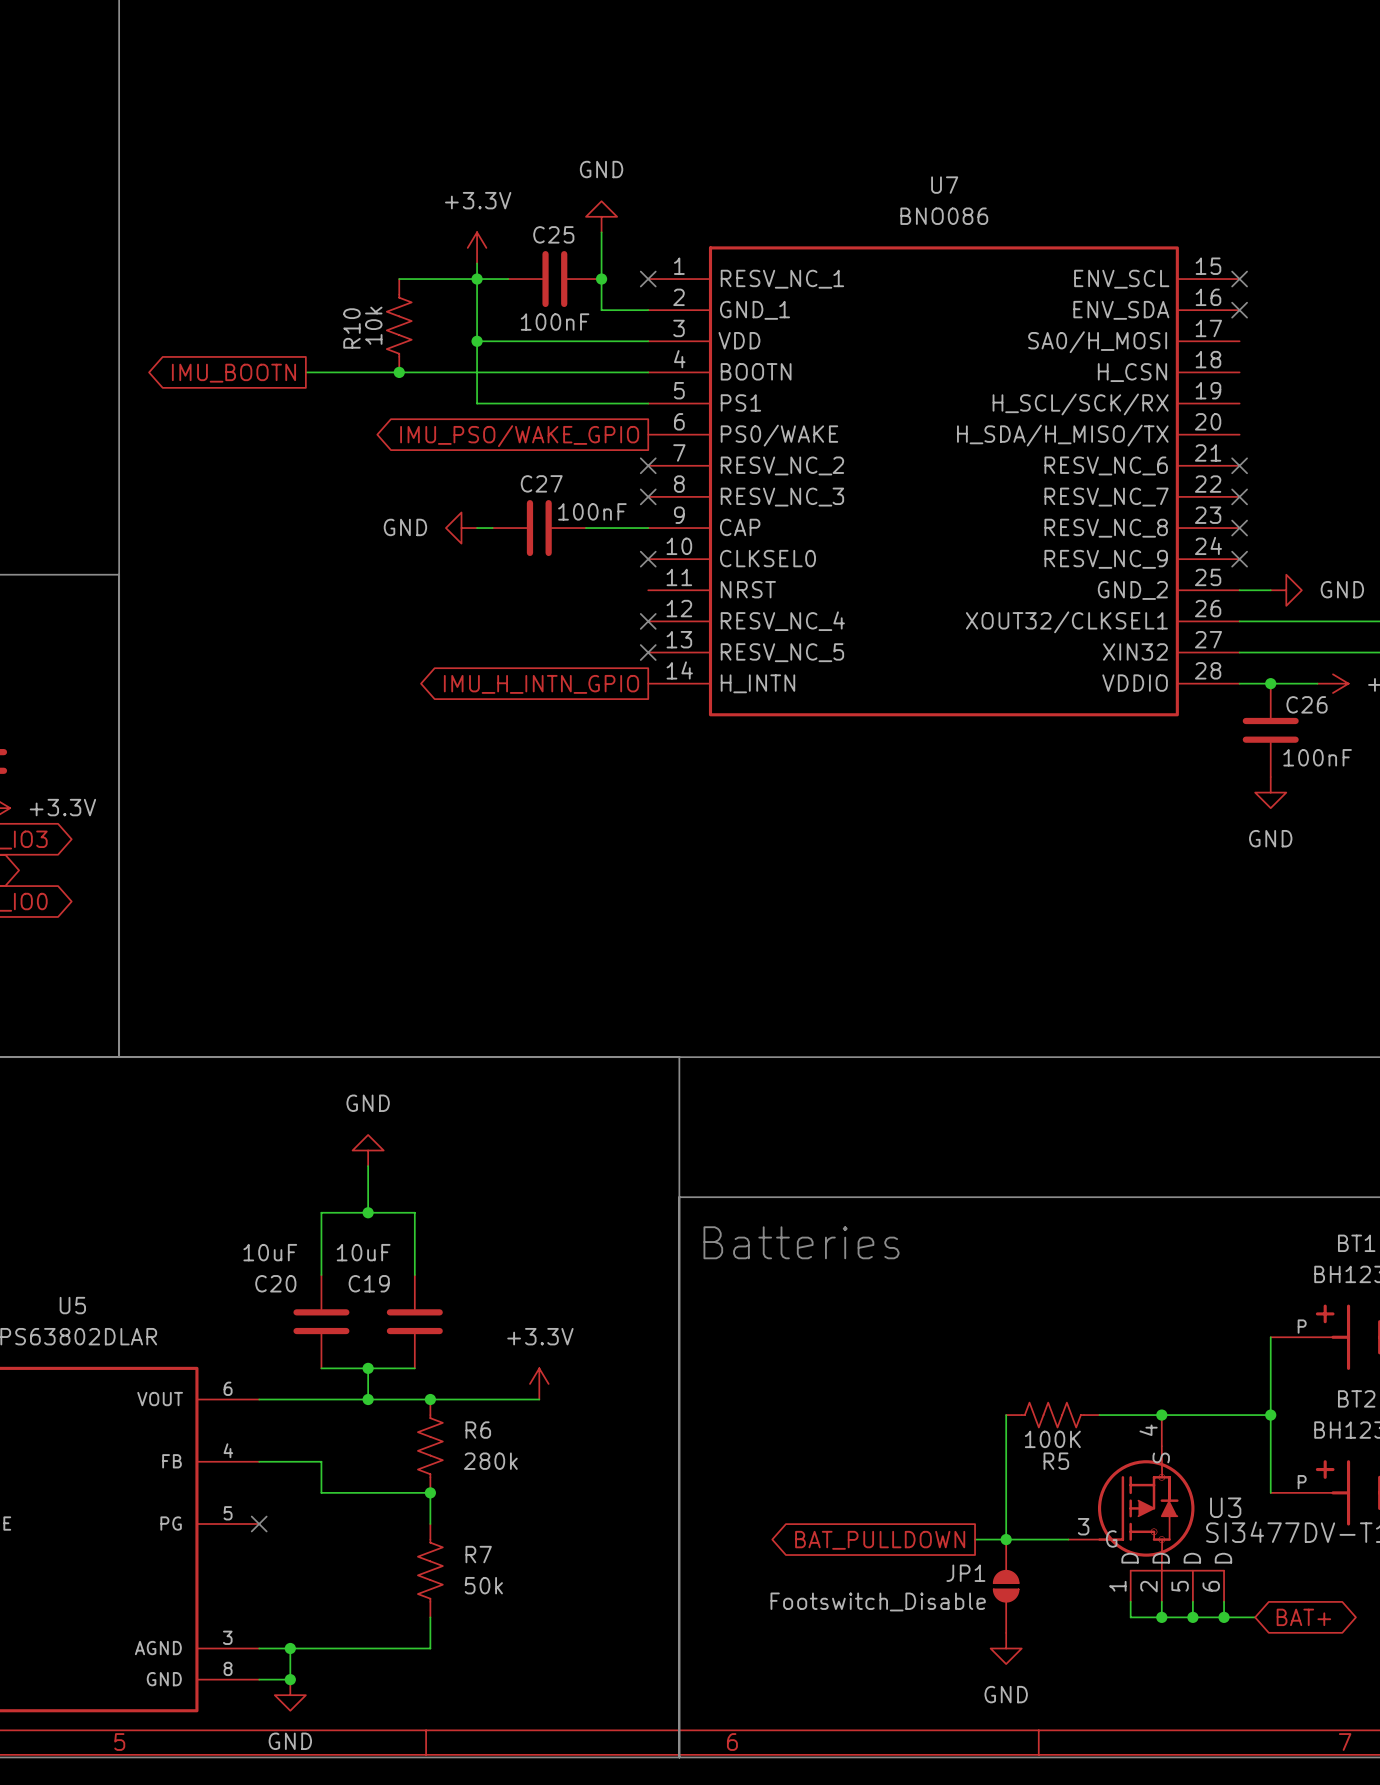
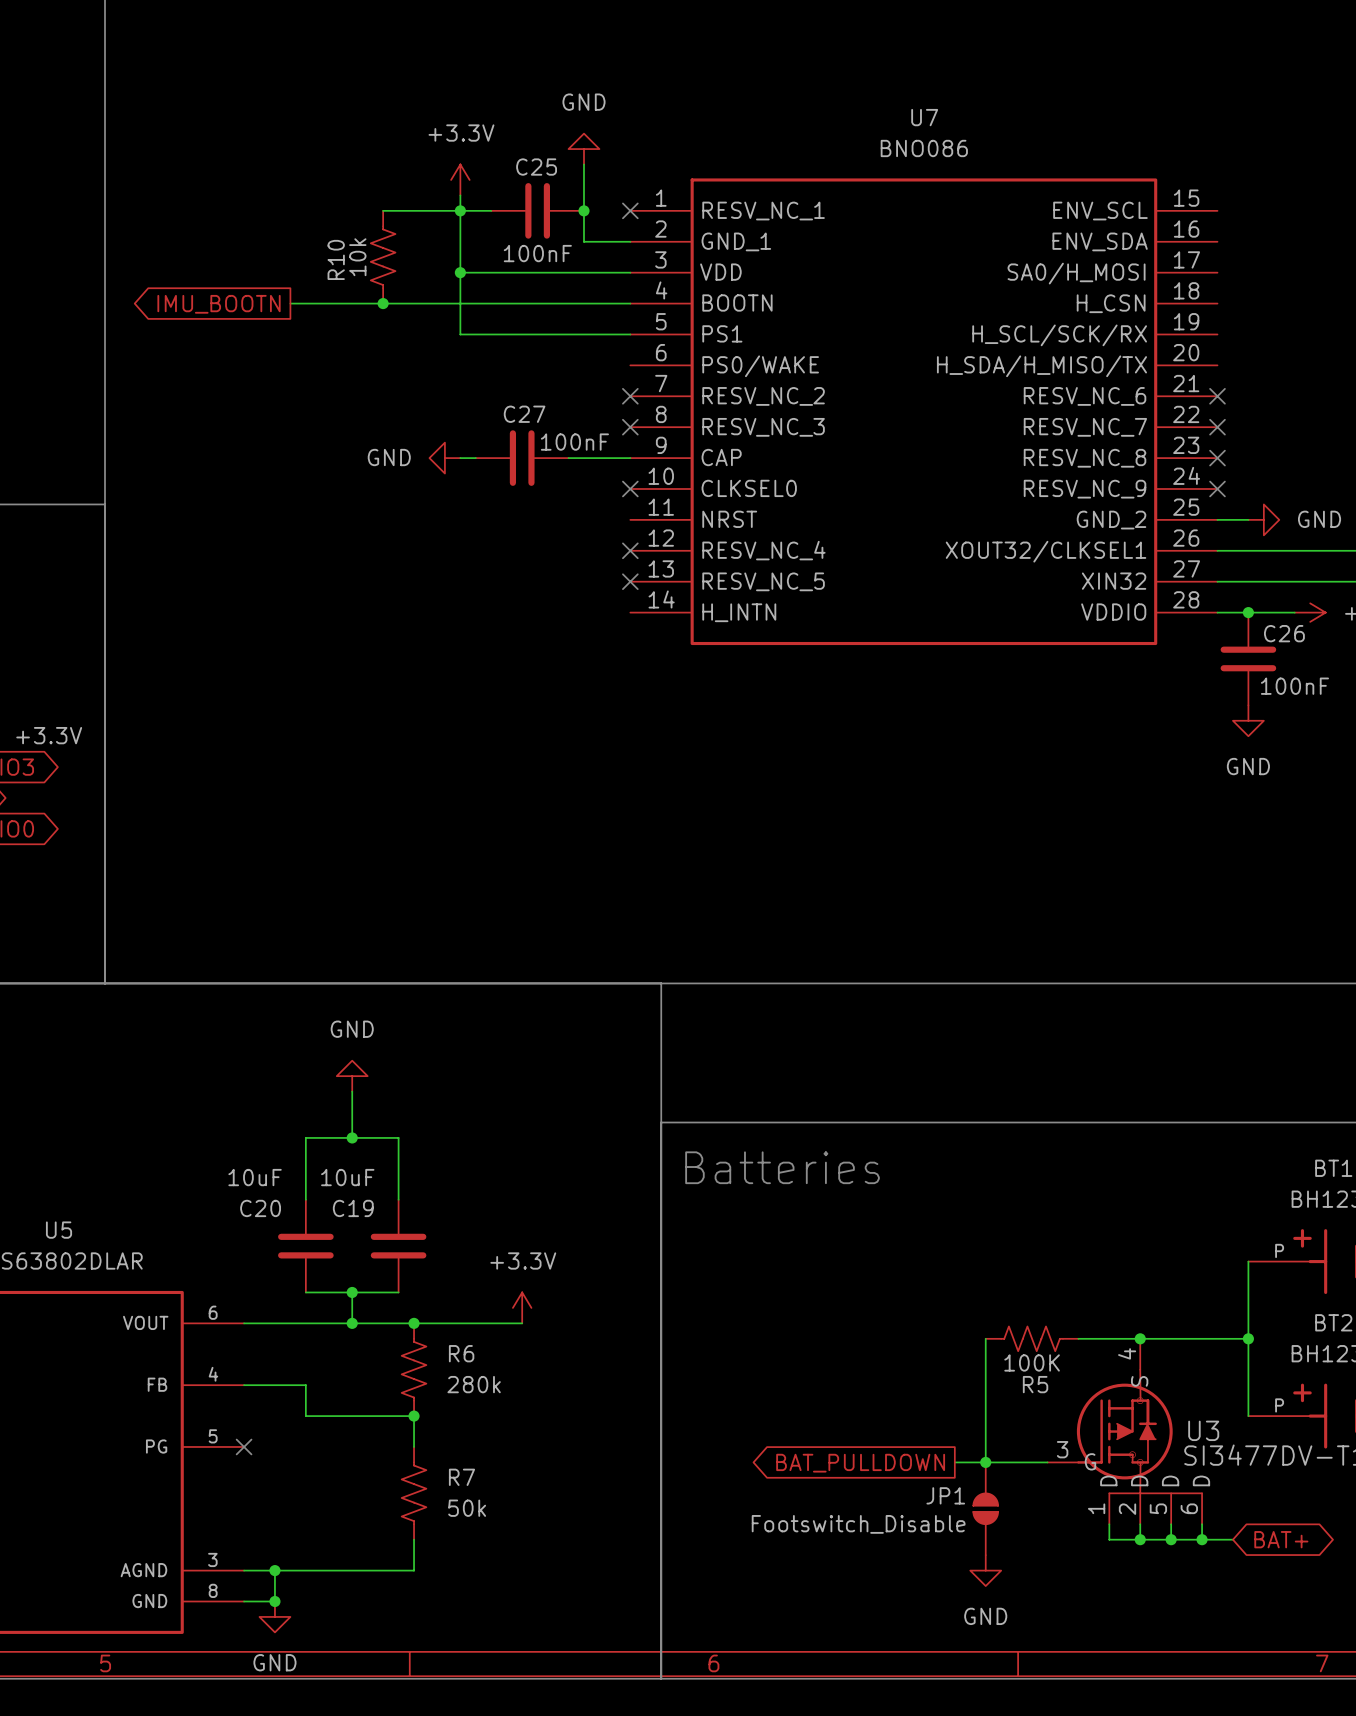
no-connect mark: (1239, 279) -> none
no-connect mark: (1239, 310) -> none
global label: IMU_PSO/WAKE_GPIO (519, 436) -> none
global label: IMU_H_INTN_GPIO (541, 684) -> none

